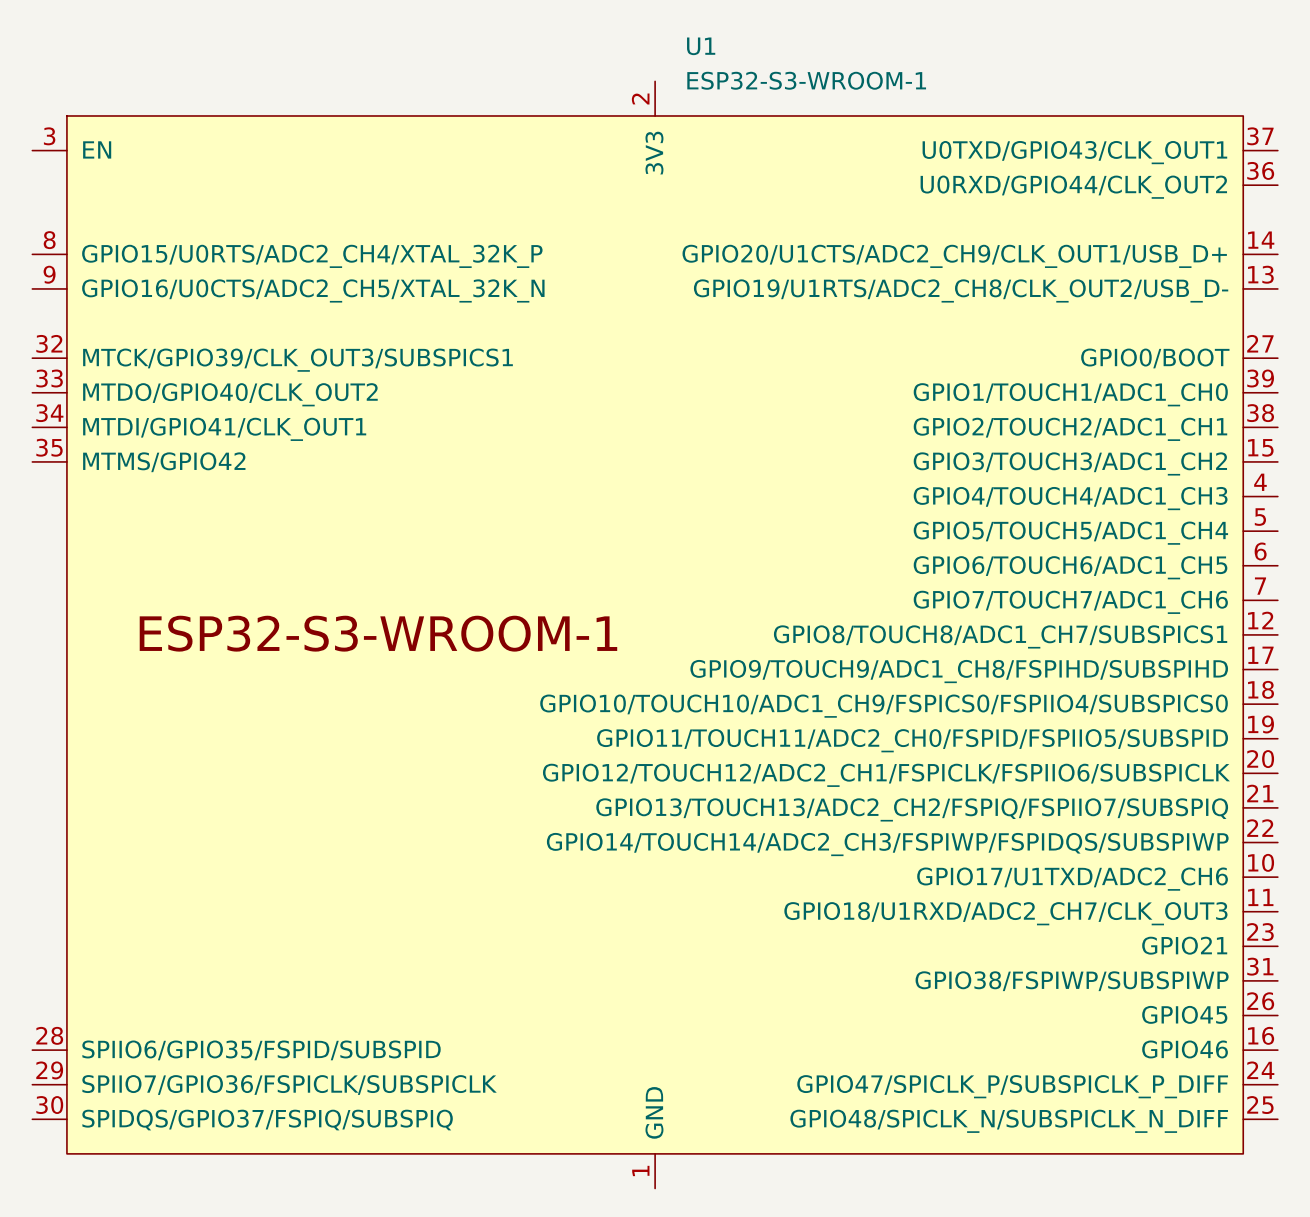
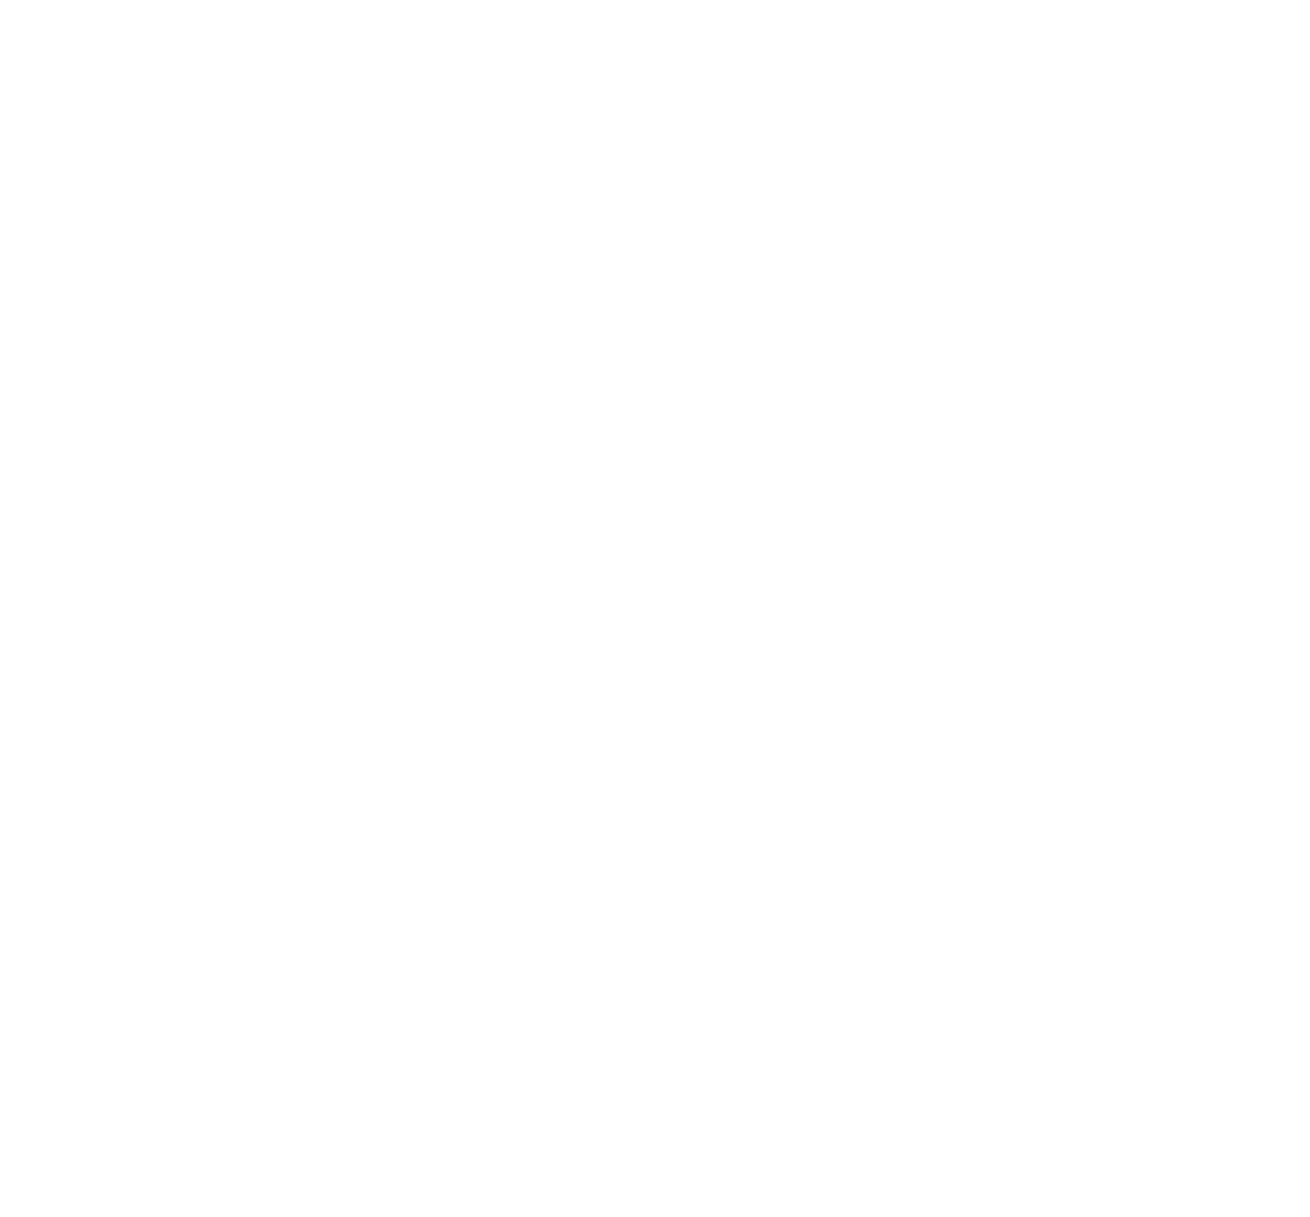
U1: ESP32-S3-WROOM-1 (655, 634) -> none

